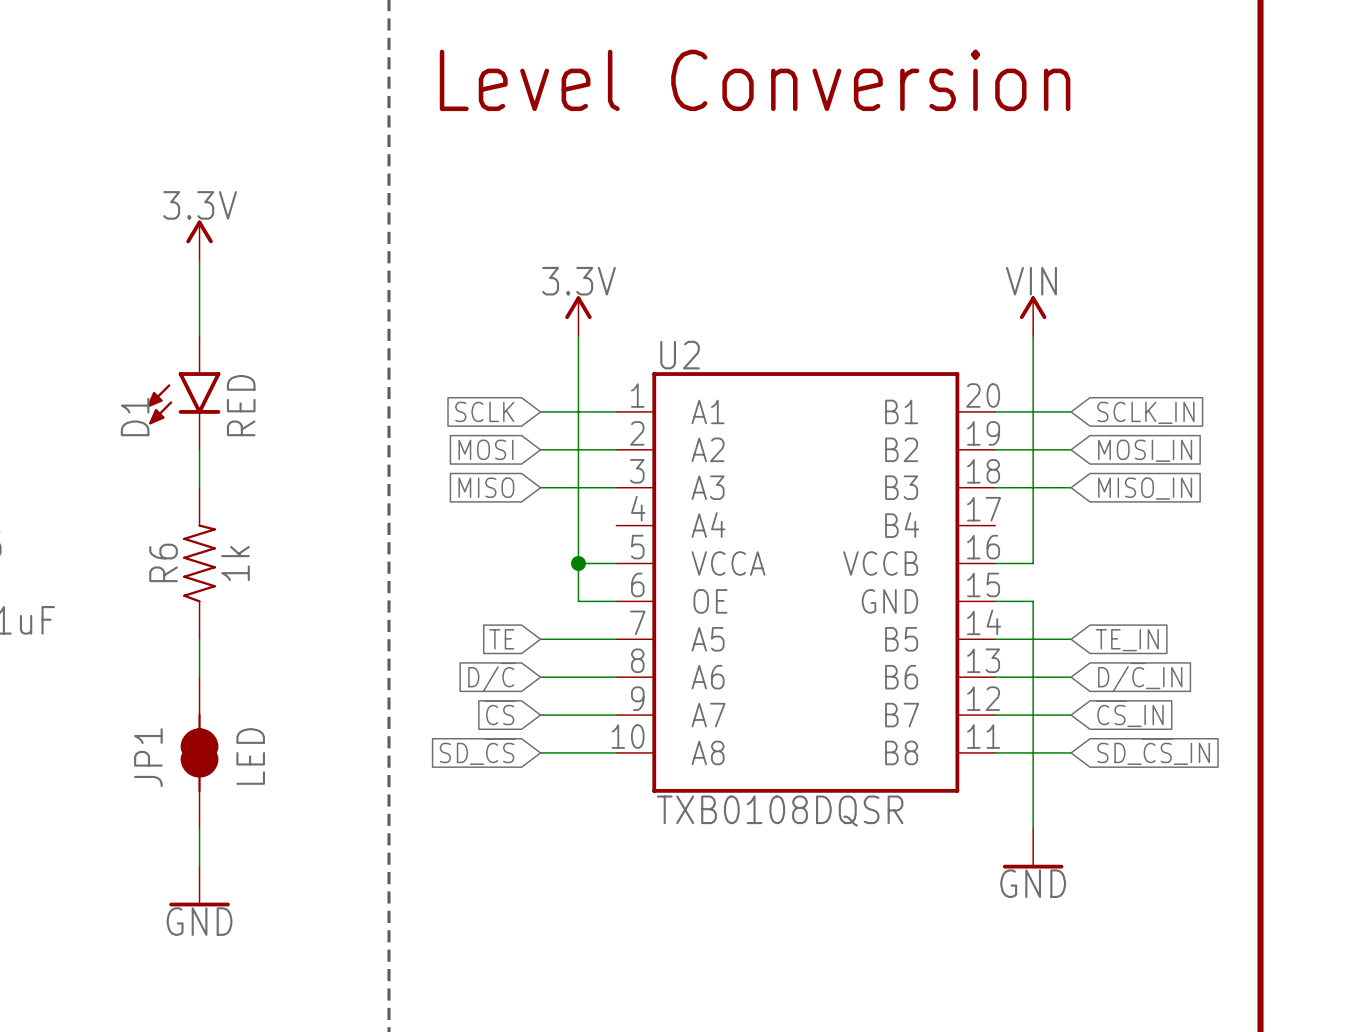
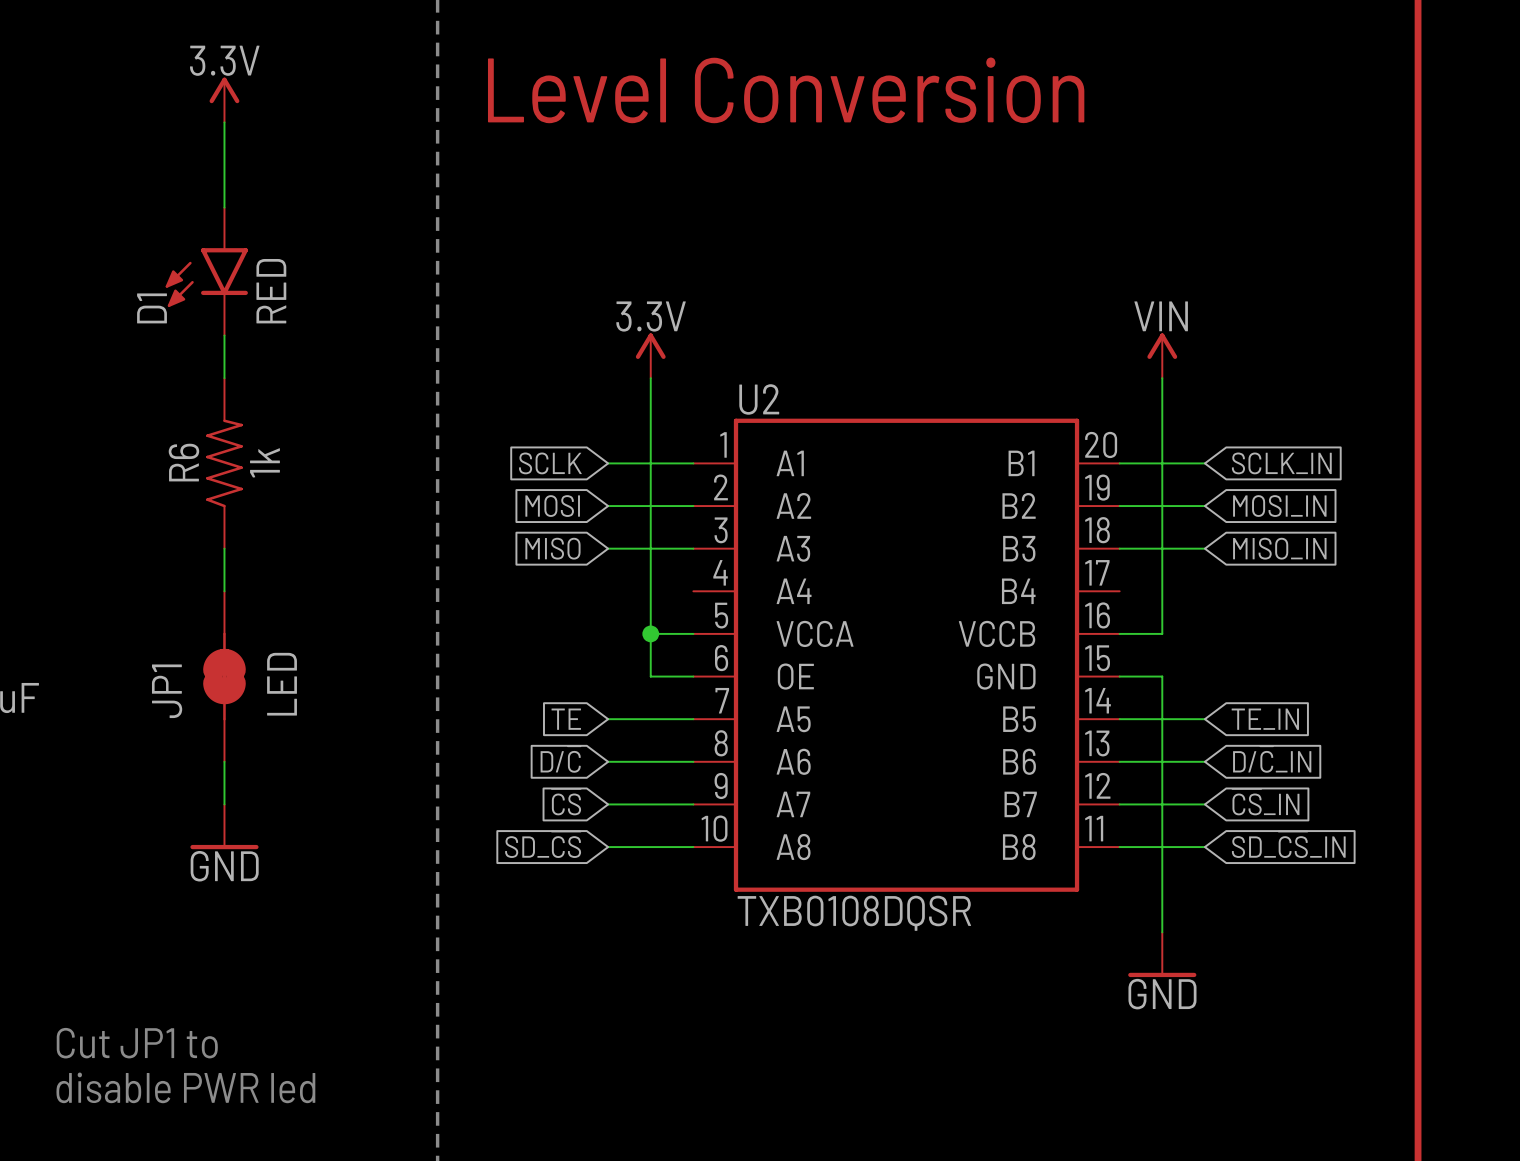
wire: none -> (224, 122) (224, 207)
power symbol position: 3.3V (199, 240) -> 3.3V (224, 100)
D1 position: (183, 392) -> (206, 271)
R6 position: (199, 563) -> (224, 463)
JP1 position: (199, 752) -> (224, 676)
wire: (199, 828) (199, 866) -> none
power symbol position: GND (199, 886) -> GND (224, 826)
text: none -> Cut JP1 to (137, 1043)
text: none -> disable PWR led (185, 1087)

